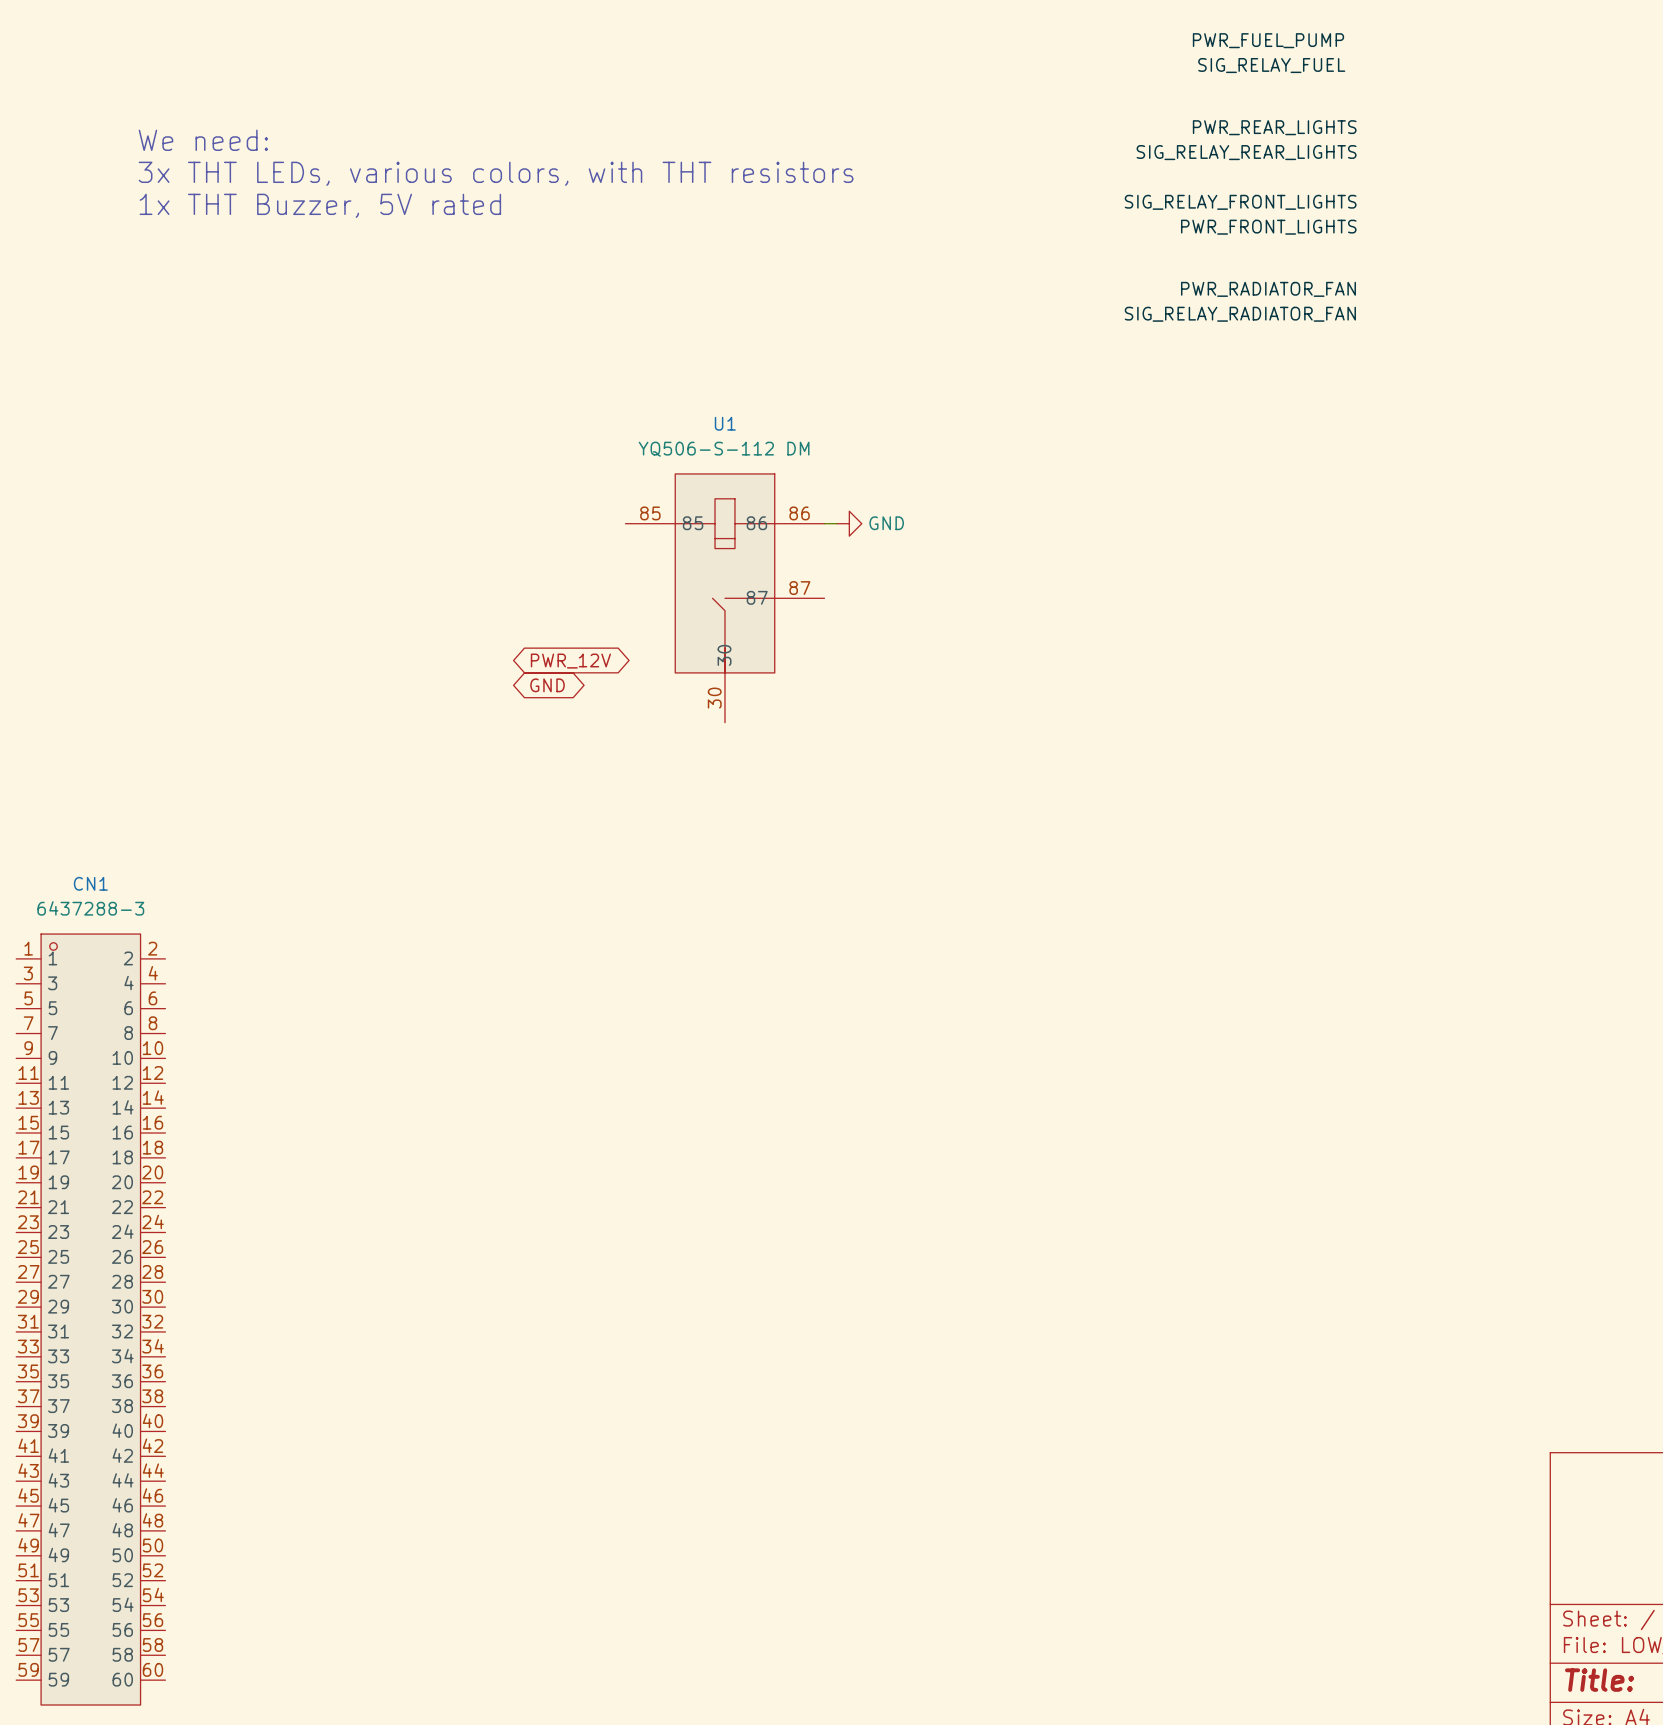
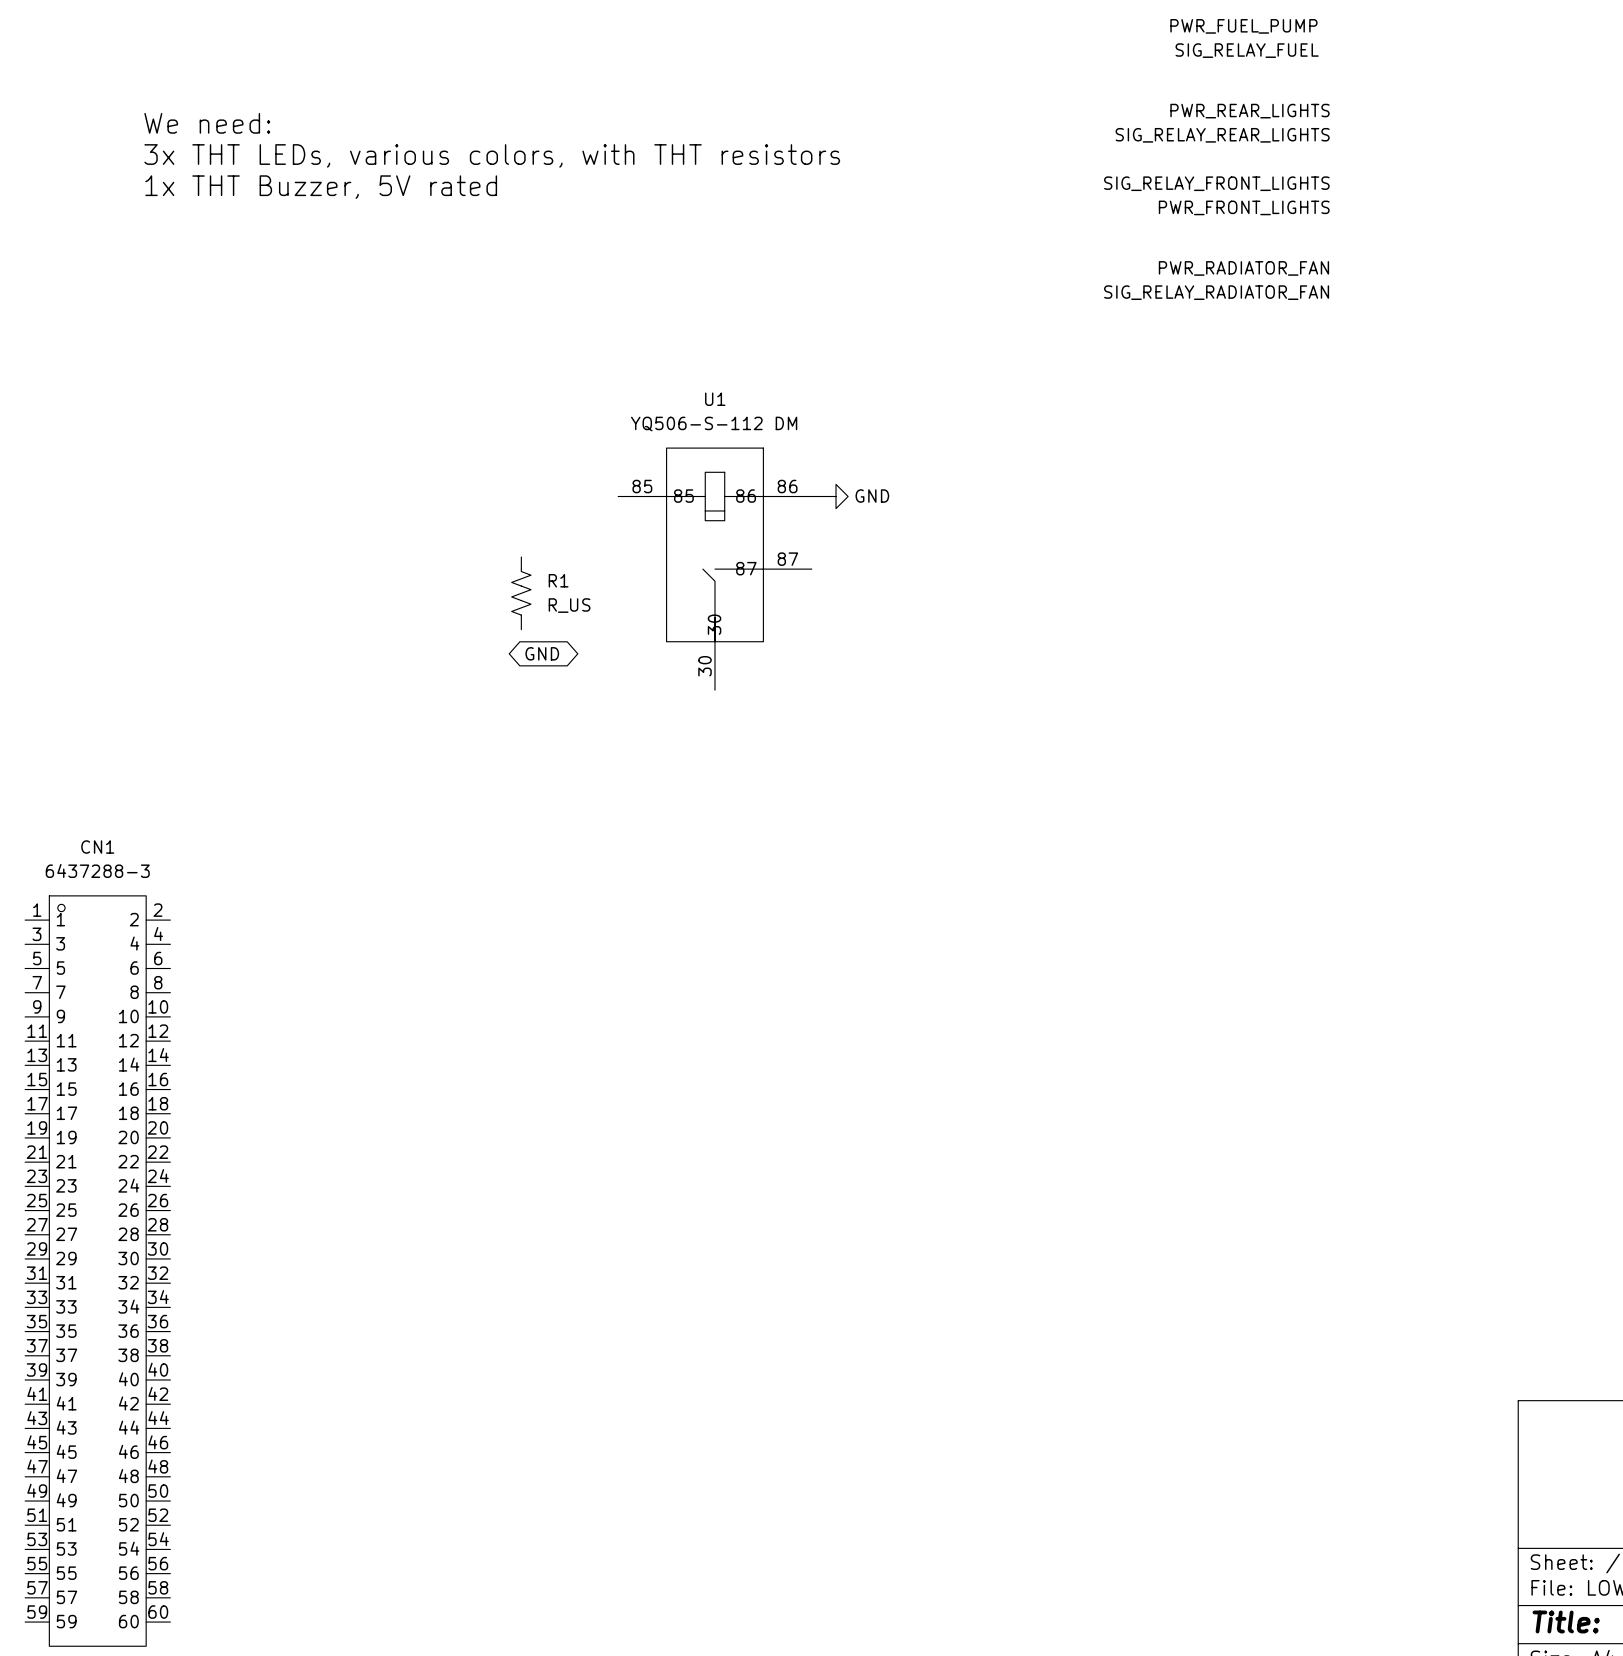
R1: none -> R_US (521, 593)
global label: PWR_12V (570, 661) -> none

